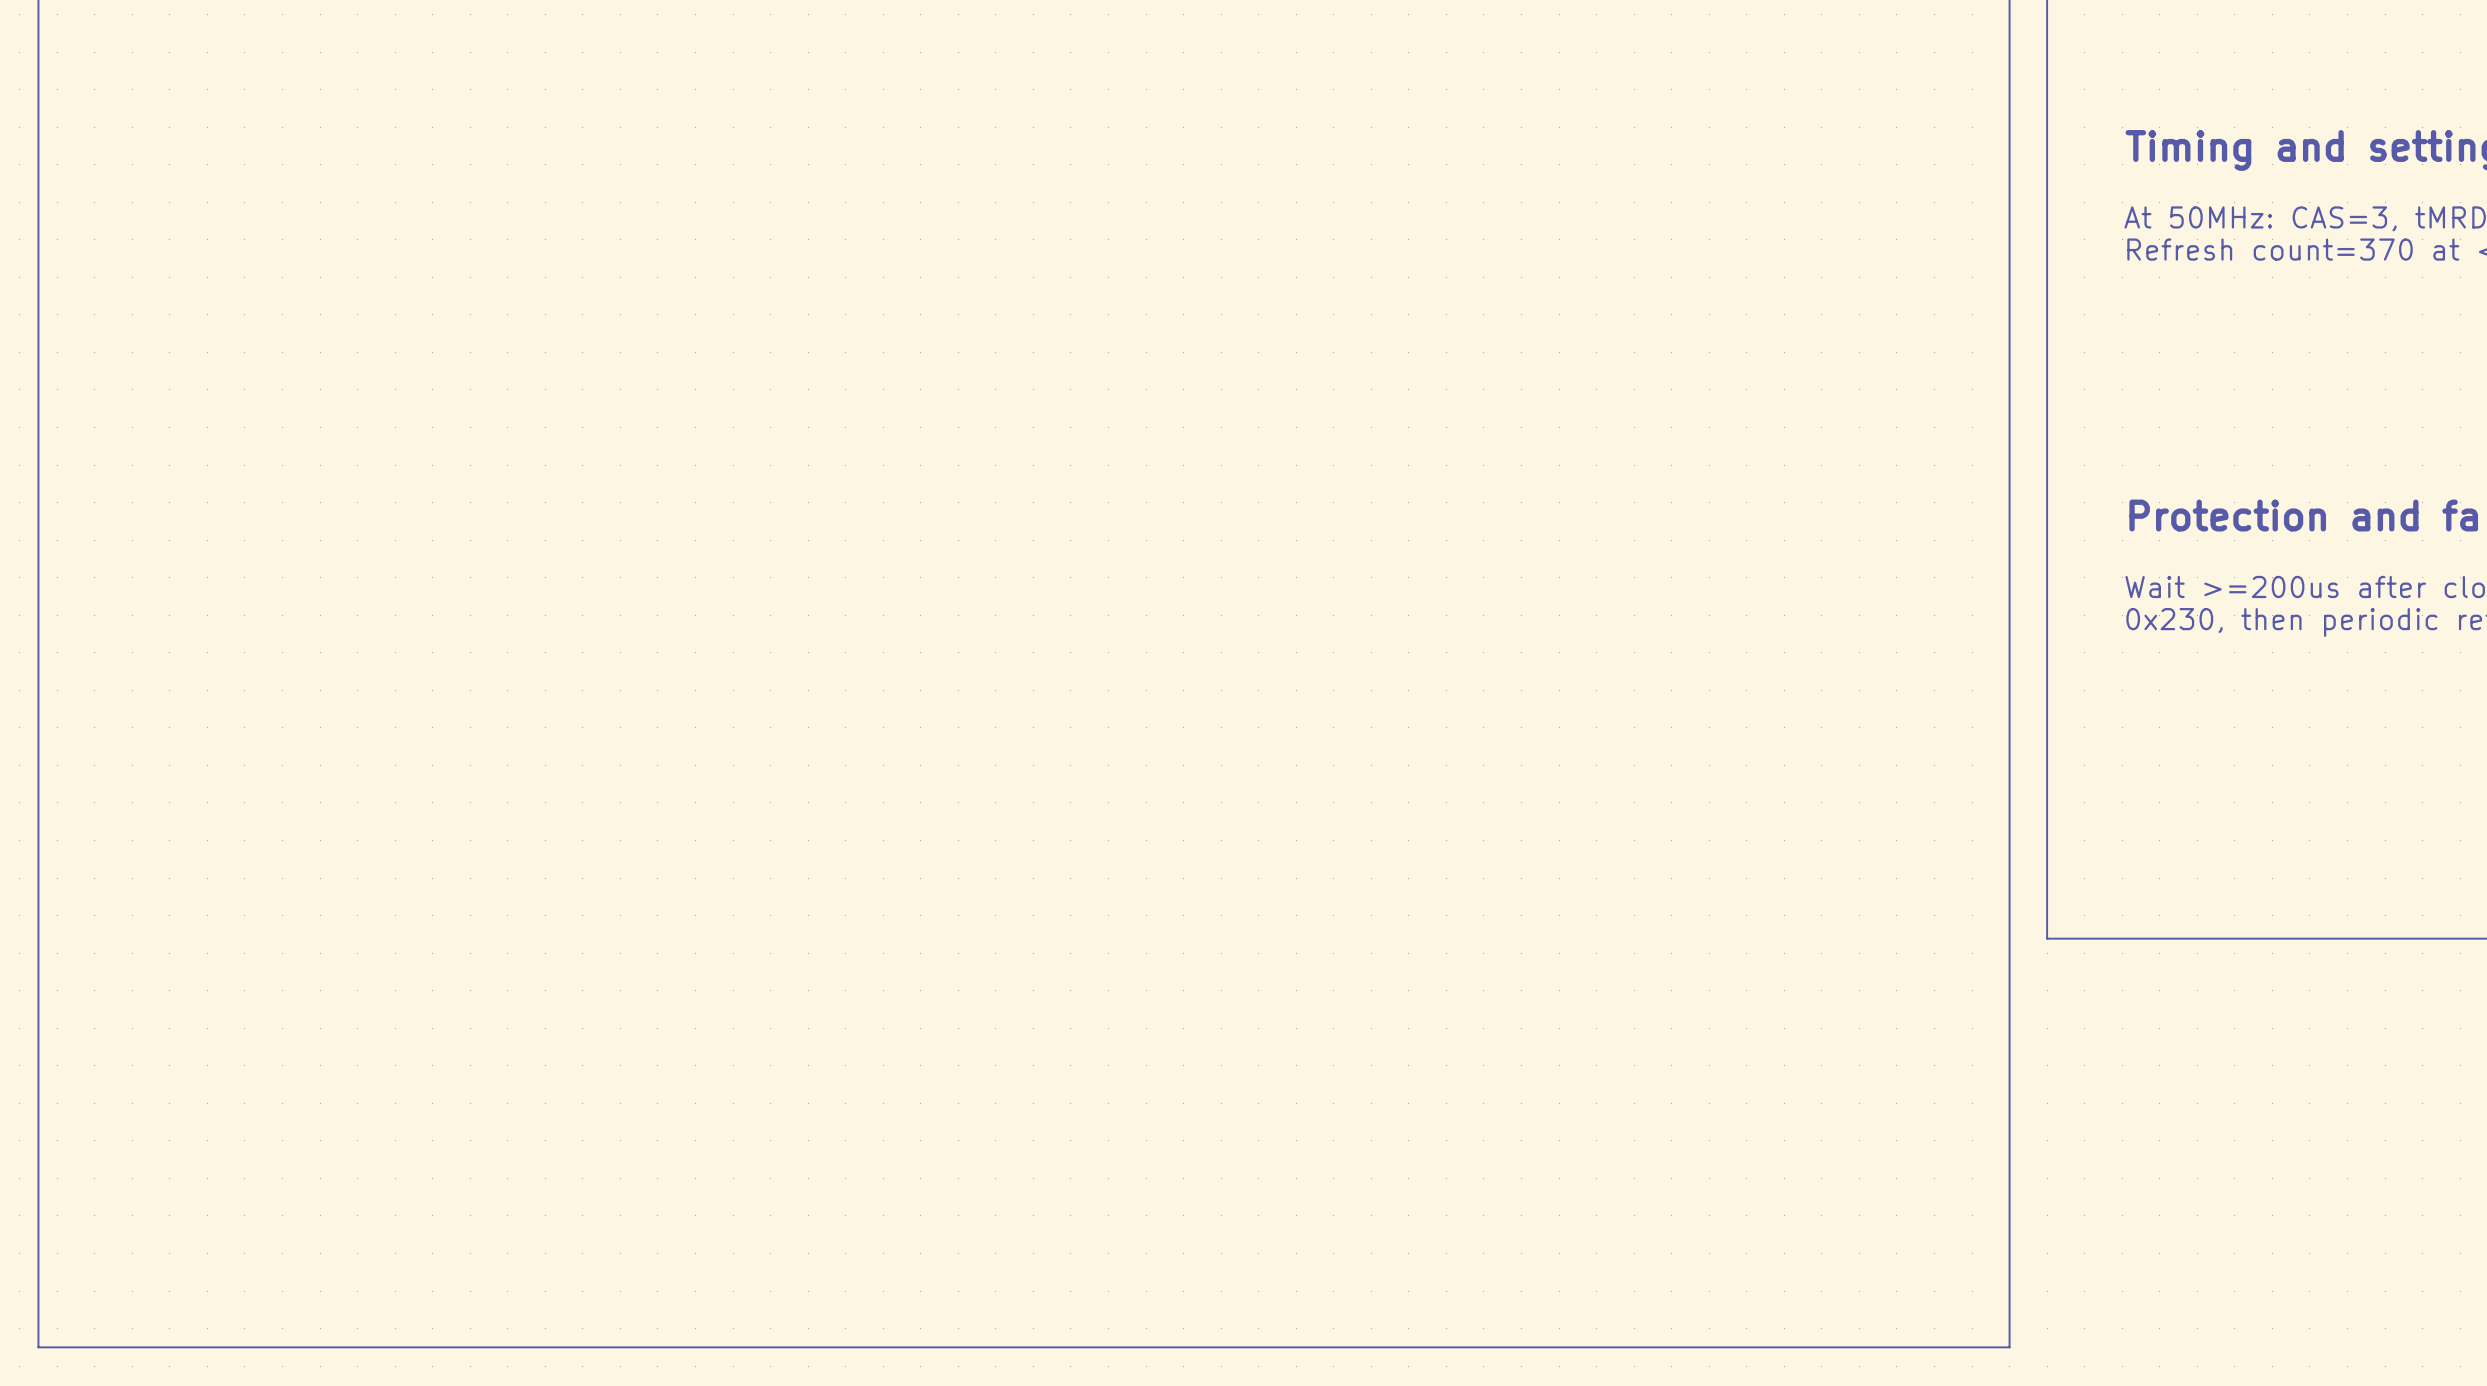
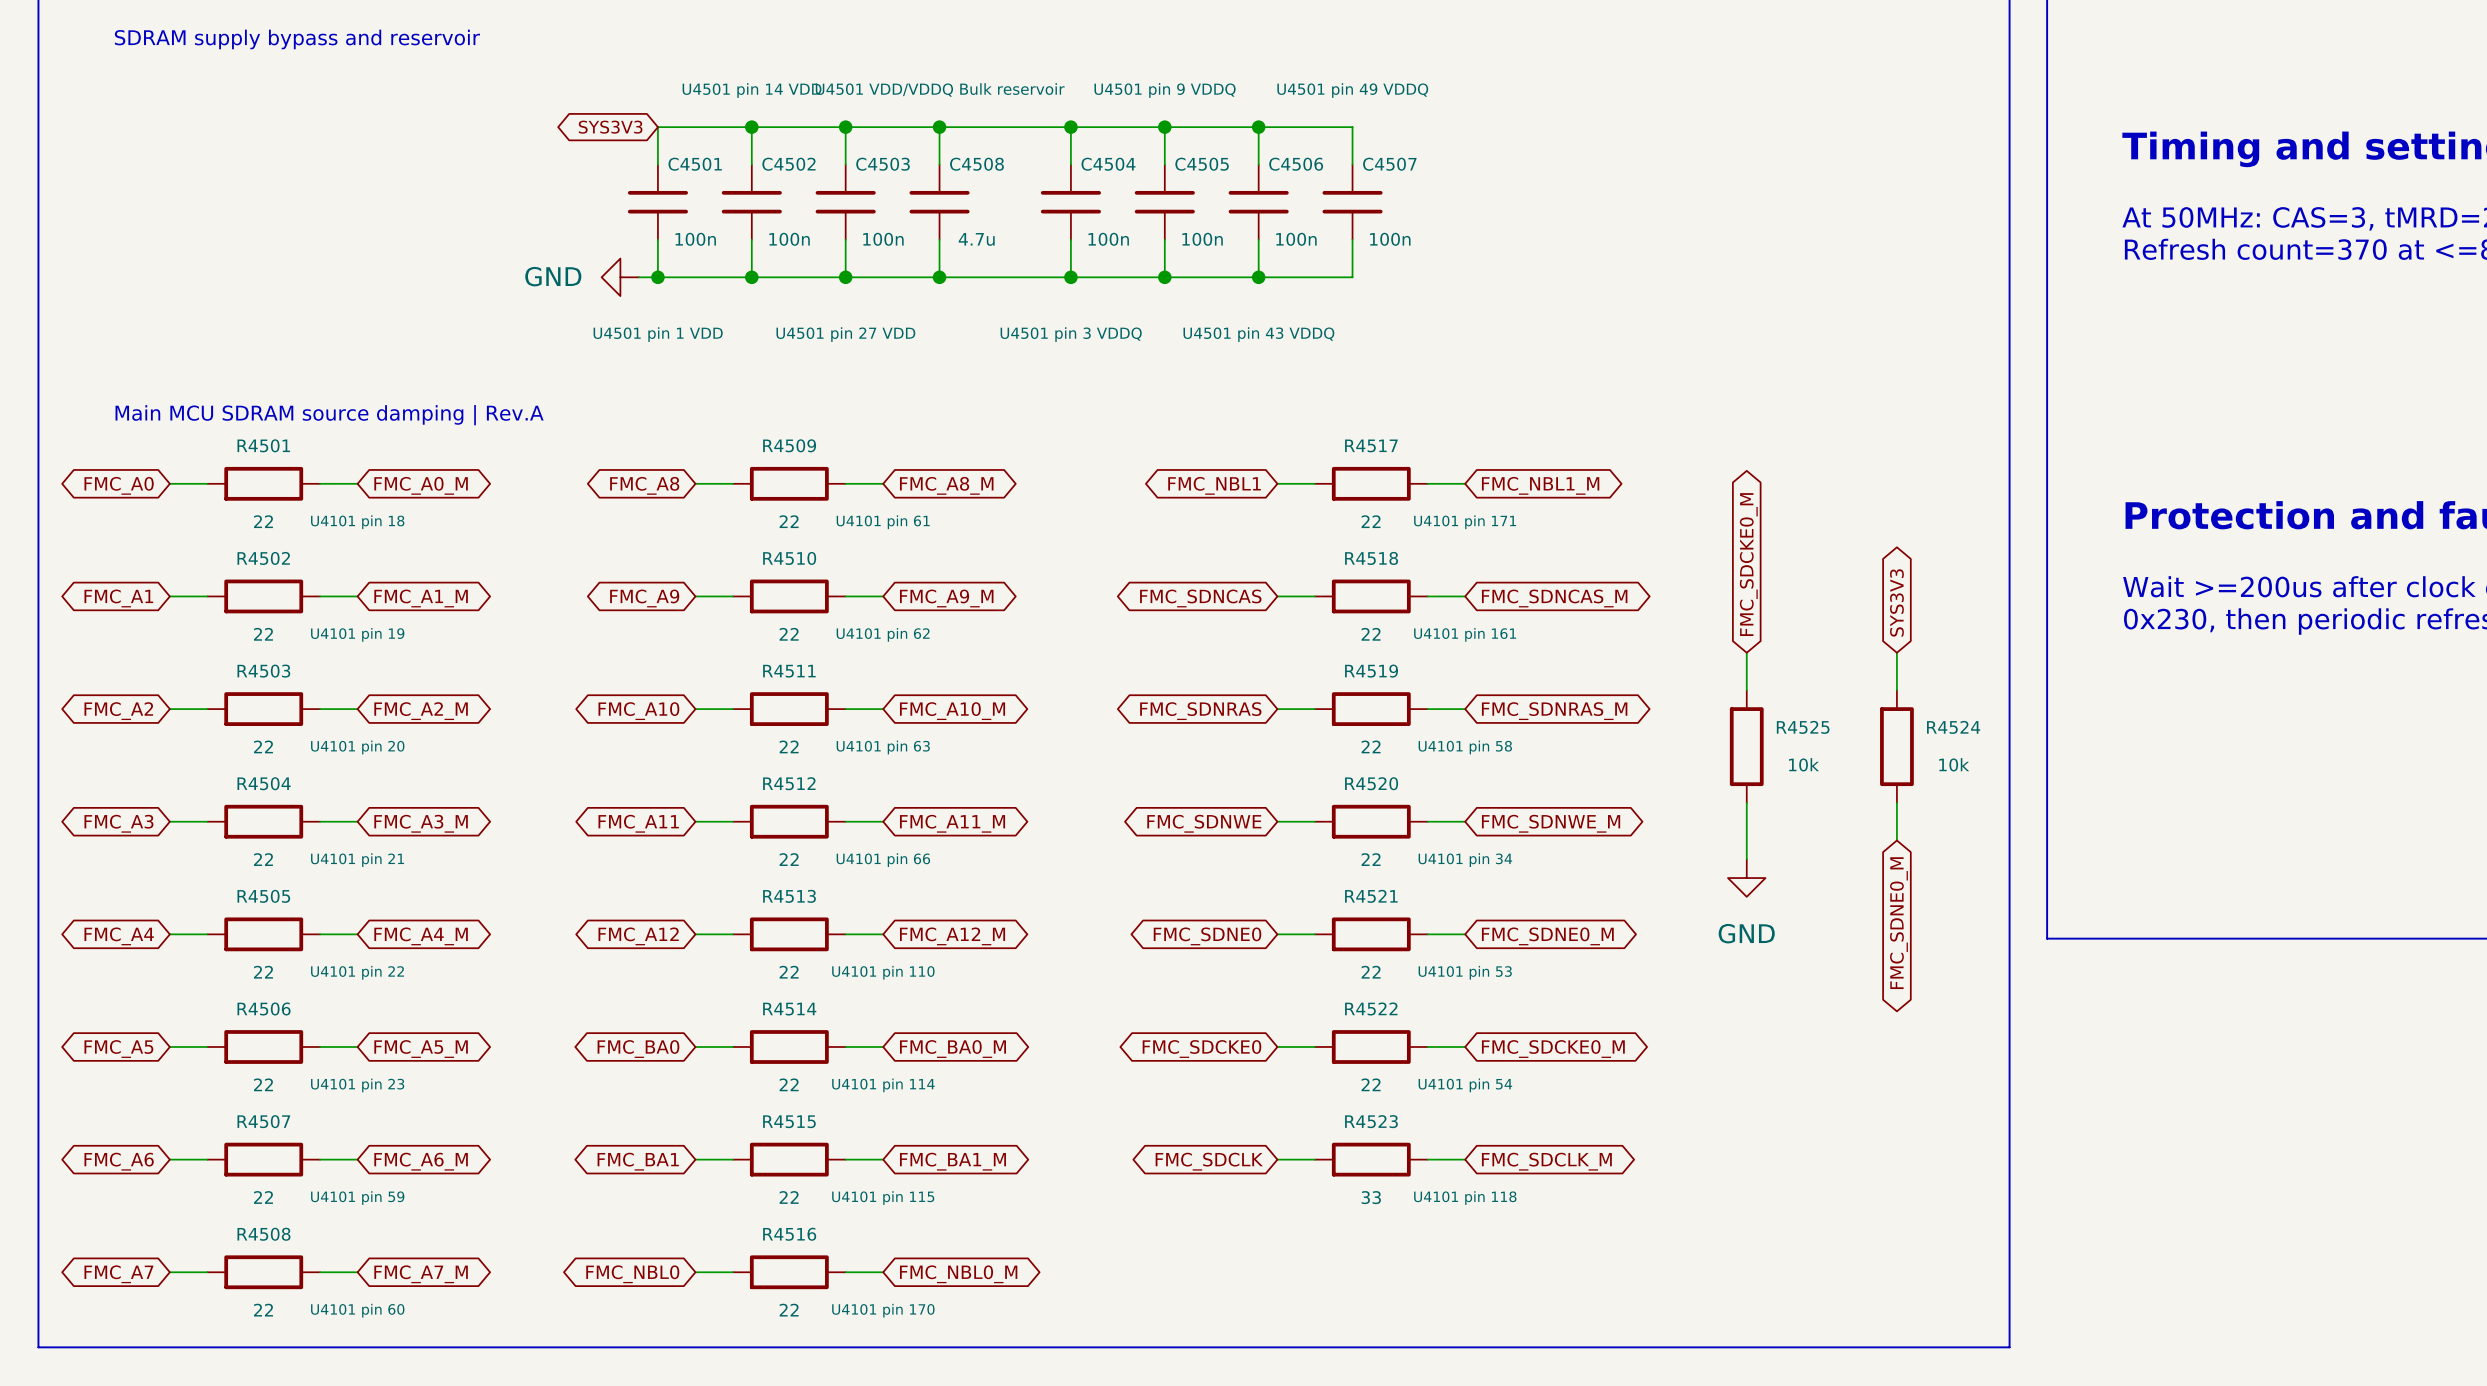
text: none -> SDRAM supply bypass and reservoir (297, 39)
global label: none -> SYS3V3 (610, 127)
wire: none -> (751, 127) (751, 164)
junction: none -> (751, 127)
wire: none -> (845, 127) (845, 164)
junction: none -> (845, 127)
wire: none -> (939, 127) (939, 164)
junction: none -> (939, 127)
wire: none -> (1070, 127) (1070, 164)
junction: none -> (1070, 127)
wire: none -> (1164, 127) (1164, 164)
junction: none -> (1164, 127)
wire: none -> (1258, 127) (1258, 164)
junction: none -> (1258, 127)
wire: none -> (657, 164) (657, 127) (1352, 127) (1352, 164)
C4501: none -> 100n (657, 202)
C4502: none -> 100n (751, 202)
C4503: none -> 100n (845, 202)
C4508: none -> 4.7u (939, 202)
C4504: none -> 100n (1070, 202)
C4505: none -> 100n (1164, 202)
C4506: none -> 100n (1258, 202)
C4507: none -> 100n (1352, 202)
wire: none -> (657, 239) (657, 277)
wire: none -> (751, 239) (751, 277)
wire: none -> (845, 239) (845, 277)
wire: none -> (939, 239) (939, 277)
wire: none -> (1070, 239) (1070, 277)
wire: none -> (1164, 239) (1164, 277)
wire: none -> (1258, 239) (1258, 277)
wire: none -> (1352, 239) (1352, 277) (639, 277)
power symbol: none -> GND (620, 277)
junction: none -> (657, 277)
junction: none -> (751, 277)
junction: none -> (845, 277)
junction: none -> (939, 277)
junction: none -> (1070, 277)
junction: none -> (1164, 277)
junction: none -> (1258, 277)
text: none -> Main MCU SDRAM source damping | Rev.A (329, 415)
wire: none -> (169, 483) (207, 483)
R4501: none -> 22 (263, 483)
wire: none -> (320, 483) (357, 483)
wire: none -> (695, 483) (733, 483)
R4509: none -> 22 (789, 483)
wire: none -> (845, 483) (883, 483)
wire: none -> (1277, 483) (1314, 483)
R4517: none -> 22 (1371, 483)
wire: none -> (1427, 483) (1465, 483)
global label: none -> FMC_A0 (119, 485)
global label: none -> FMC_A0_M (421, 485)
global label: none -> FMC_A8 (644, 485)
global label: none -> FMC_A8_M (946, 485)
global label: none -> FMC_NBL1 (1214, 485)
global label: none -> FMC_NBL1_M (1540, 485)
global label: none -> FMC_SDCKE0_M (1748, 564)
wire: none -> (169, 596) (207, 596)
R4502: none -> 22 (263, 596)
wire: none -> (320, 596) (357, 596)
wire: none -> (695, 596) (733, 596)
R4510: none -> 22 (789, 596)
wire: none -> (845, 596) (883, 596)
wire: none -> (1277, 596) (1314, 596)
R4518: none -> 22 (1371, 596)
wire: none -> (1427, 596) (1465, 596)
global label: none -> FMC_A1 (118, 598)
global label: none -> FMC_A1_M (421, 598)
global label: none -> FMC_A9 (644, 598)
global label: none -> FMC_A9_M (946, 598)
global label: none -> FMC_SDNCAS (1200, 598)
global label: none -> FMC_SDNCAS_M (1554, 598)
global label: none -> SYS3V3 (1896, 602)
wire: none -> (1746, 652) (1746, 690)
wire: none -> (1896, 652) (1896, 690)
global label: none -> FMC_A2 (118, 711)
wire: none -> (169, 709) (207, 709)
R4503: none -> 22 (263, 709)
wire: none -> (320, 709) (357, 709)
global label: none -> FMC_A2_M (421, 711)
global label: none -> FMC_A10 (638, 711)
wire: none -> (695, 709) (733, 709)
R4511: none -> 22 (789, 709)
wire: none -> (845, 709) (883, 709)
global label: none -> FMC_A10_M (952, 711)
global label: none -> FMC_SDNRAS (1200, 711)
wire: none -> (1277, 709) (1314, 709)
R4519: none -> 22 (1371, 709)
wire: none -> (1427, 709) (1465, 709)
global label: none -> FMC_SDNRAS_M (1554, 711)
R4525: none -> 10k (1746, 746)
R4524: none -> 10k (1896, 746)
wire: none -> (1746, 802) (1746, 859)
wire: none -> (1896, 802) (1896, 840)
wire: none -> (169, 821) (207, 821)
R4504: none -> 22 (263, 821)
wire: none -> (320, 821) (357, 821)
wire: none -> (695, 821) (733, 821)
R4512: none -> 22 (789, 821)
wire: none -> (845, 821) (883, 821)
wire: none -> (1277, 821) (1314, 821)
R4520: none -> 22 (1371, 821)
wire: none -> (1427, 821) (1465, 821)
global label: none -> FMC_A3 (118, 823)
global label: none -> FMC_A3_M (421, 823)
global label: none -> FMC_A11 (638, 823)
global label: none -> FMC_A11_M (952, 823)
global label: none -> FMC_SDNWE (1204, 823)
global label: none -> FMC_SDNWE_M (1551, 823)
power symbol: none -> GND (1746, 878)
global label: none -> FMC_SDNE0_M (1898, 923)
global label: none -> FMC_A4 (119, 936)
wire: none -> (169, 934) (207, 934)
R4505: none -> 22 (263, 934)
wire: none -> (320, 934) (357, 934)
global label: none -> FMC_A4_M (421, 936)
global label: none -> FMC_A12 (638, 936)
wire: none -> (695, 934) (733, 934)
R4513: none -> 22 (789, 934)
wire: none -> (845, 934) (883, 934)
global label: none -> FMC_A12_M (952, 936)
global label: none -> FMC_SDNE0 (1207, 936)
wire: none -> (1277, 934) (1314, 934)
R4521: none -> 22 (1371, 934)
wire: none -> (1427, 934) (1465, 934)
global label: none -> FMC_SDNE0_M (1547, 936)
wire: none -> (169, 1046) (207, 1046)
R4506: none -> 22 (263, 1046)
wire: none -> (320, 1046) (357, 1046)
wire: none -> (695, 1046) (733, 1046)
R4514: none -> 22 (789, 1046)
wire: none -> (845, 1046) (883, 1046)
wire: none -> (1277, 1046) (1314, 1046)
R4522: none -> 22 (1371, 1046)
wire: none -> (1427, 1046) (1465, 1046)
global label: none -> FMC_A5 (118, 1049)
global label: none -> FMC_A5_M (421, 1049)
global label: none -> FMC_BA0 (638, 1049)
global label: none -> FMC_BA0_M (952, 1049)
global label: none -> FMC_SDCKE0 (1201, 1049)
global label: none -> FMC_SDCKE0_M (1553, 1049)
wire: none -> (169, 1159) (207, 1159)
R4507: none -> 22 (263, 1159)
wire: none -> (320, 1159) (357, 1159)
wire: none -> (695, 1159) (733, 1159)
R4515: none -> 22 (789, 1159)
wire: none -> (845, 1159) (883, 1159)
wire: none -> (1277, 1159) (1314, 1159)
R4523: none -> 33 (1371, 1159)
wire: none -> (1427, 1159) (1465, 1159)
global label: none -> FMC_A6 (119, 1161)
global label: none -> FMC_A6_M (421, 1161)
global label: none -> FMC_BA1 (638, 1161)
global label: none -> FMC_BA1_M (952, 1161)
global label: none -> FMC_SDCLK (1209, 1161)
global label: none -> FMC_SDCLK_M (1546, 1161)
global label: none -> FMC_A7 (118, 1274)
wire: none -> (169, 1272) (207, 1272)
R4508: none -> 22 (263, 1272)
wire: none -> (320, 1272) (357, 1272)
global label: none -> FMC_A7_M (421, 1274)
global label: none -> FMC_NBL0 (632, 1274)
wire: none -> (695, 1272) (733, 1272)
R4516: none -> 22 (789, 1272)
wire: none -> (845, 1272) (883, 1272)
global label: none -> FMC_NBL0_M (958, 1274)

